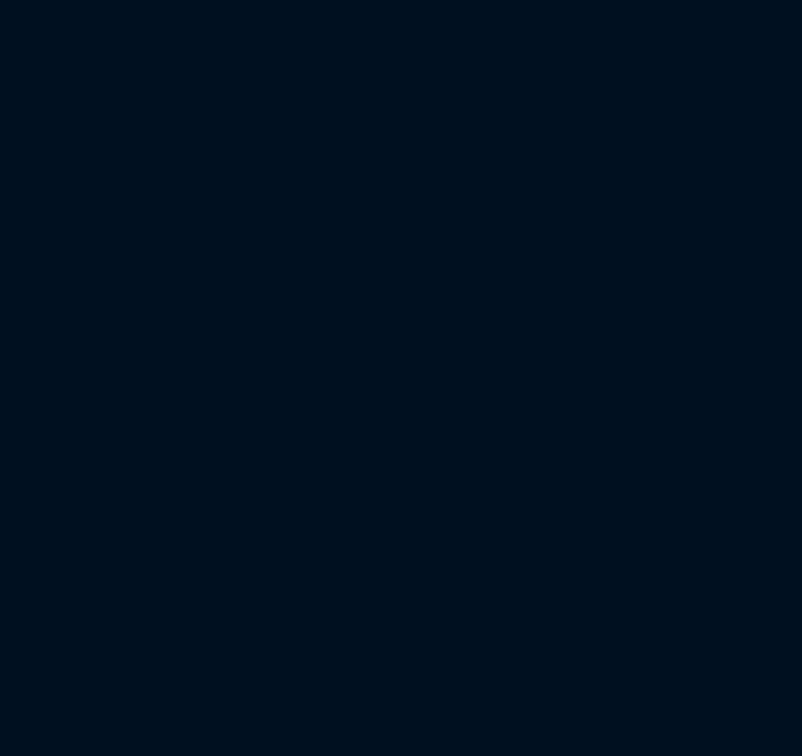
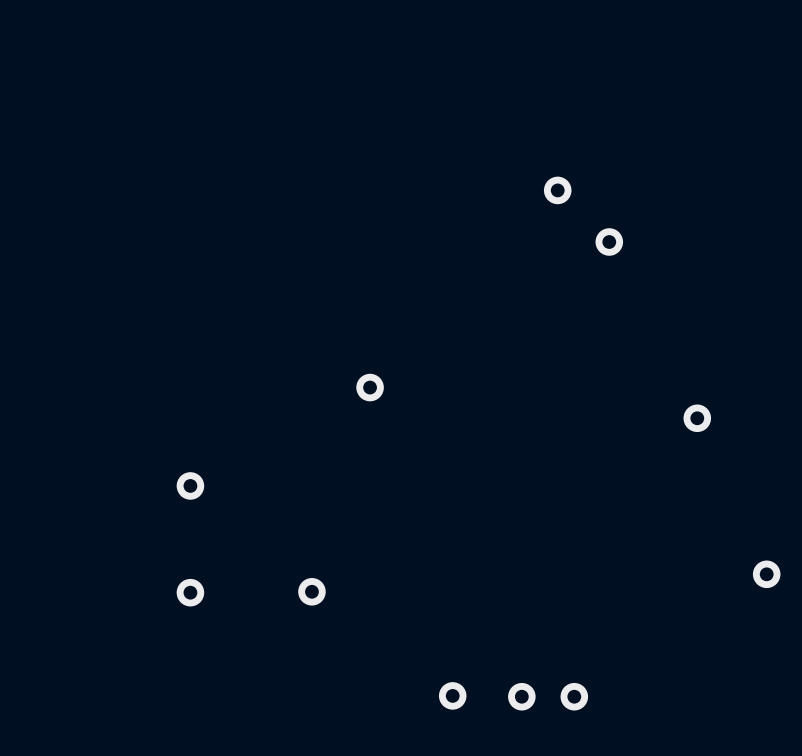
via: none -> (557, 190)
via: none -> (609, 241)
via: none -> (370, 387)
via: none -> (697, 418)
via: none -> (190, 485)
via: none -> (766, 574)
via: none -> (311, 591)
via: none -> (190, 592)
via: none -> (452, 695)
via: none -> (521, 696)
via: none -> (574, 696)

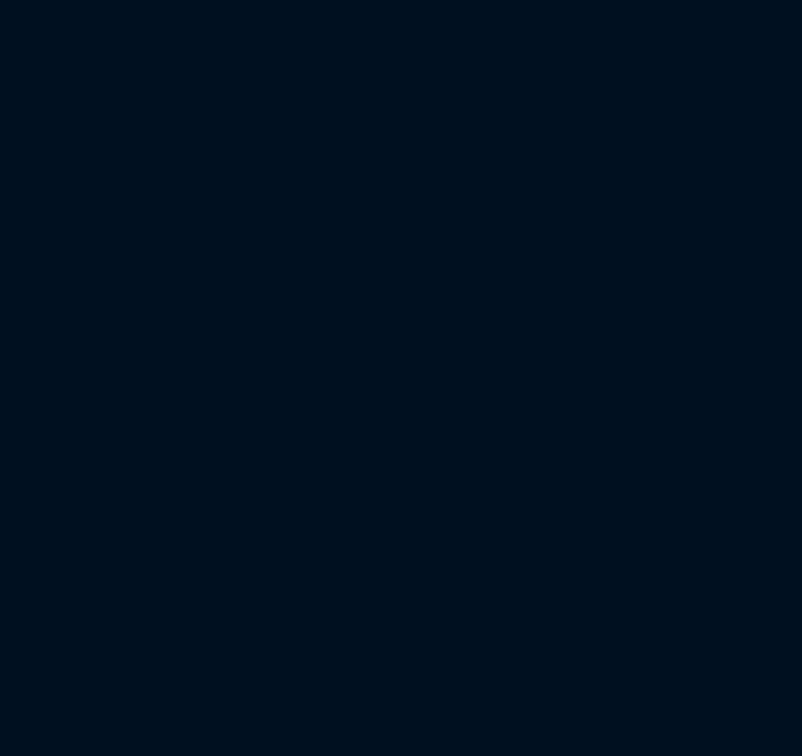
via: (557, 190) -> none
via: (609, 241) -> none
via: (370, 387) -> none
via: (697, 418) -> none
via: (190, 485) -> none
via: (766, 574) -> none
via: (311, 591) -> none
via: (190, 592) -> none
via: (452, 695) -> none
via: (521, 696) -> none
via: (574, 696) -> none

